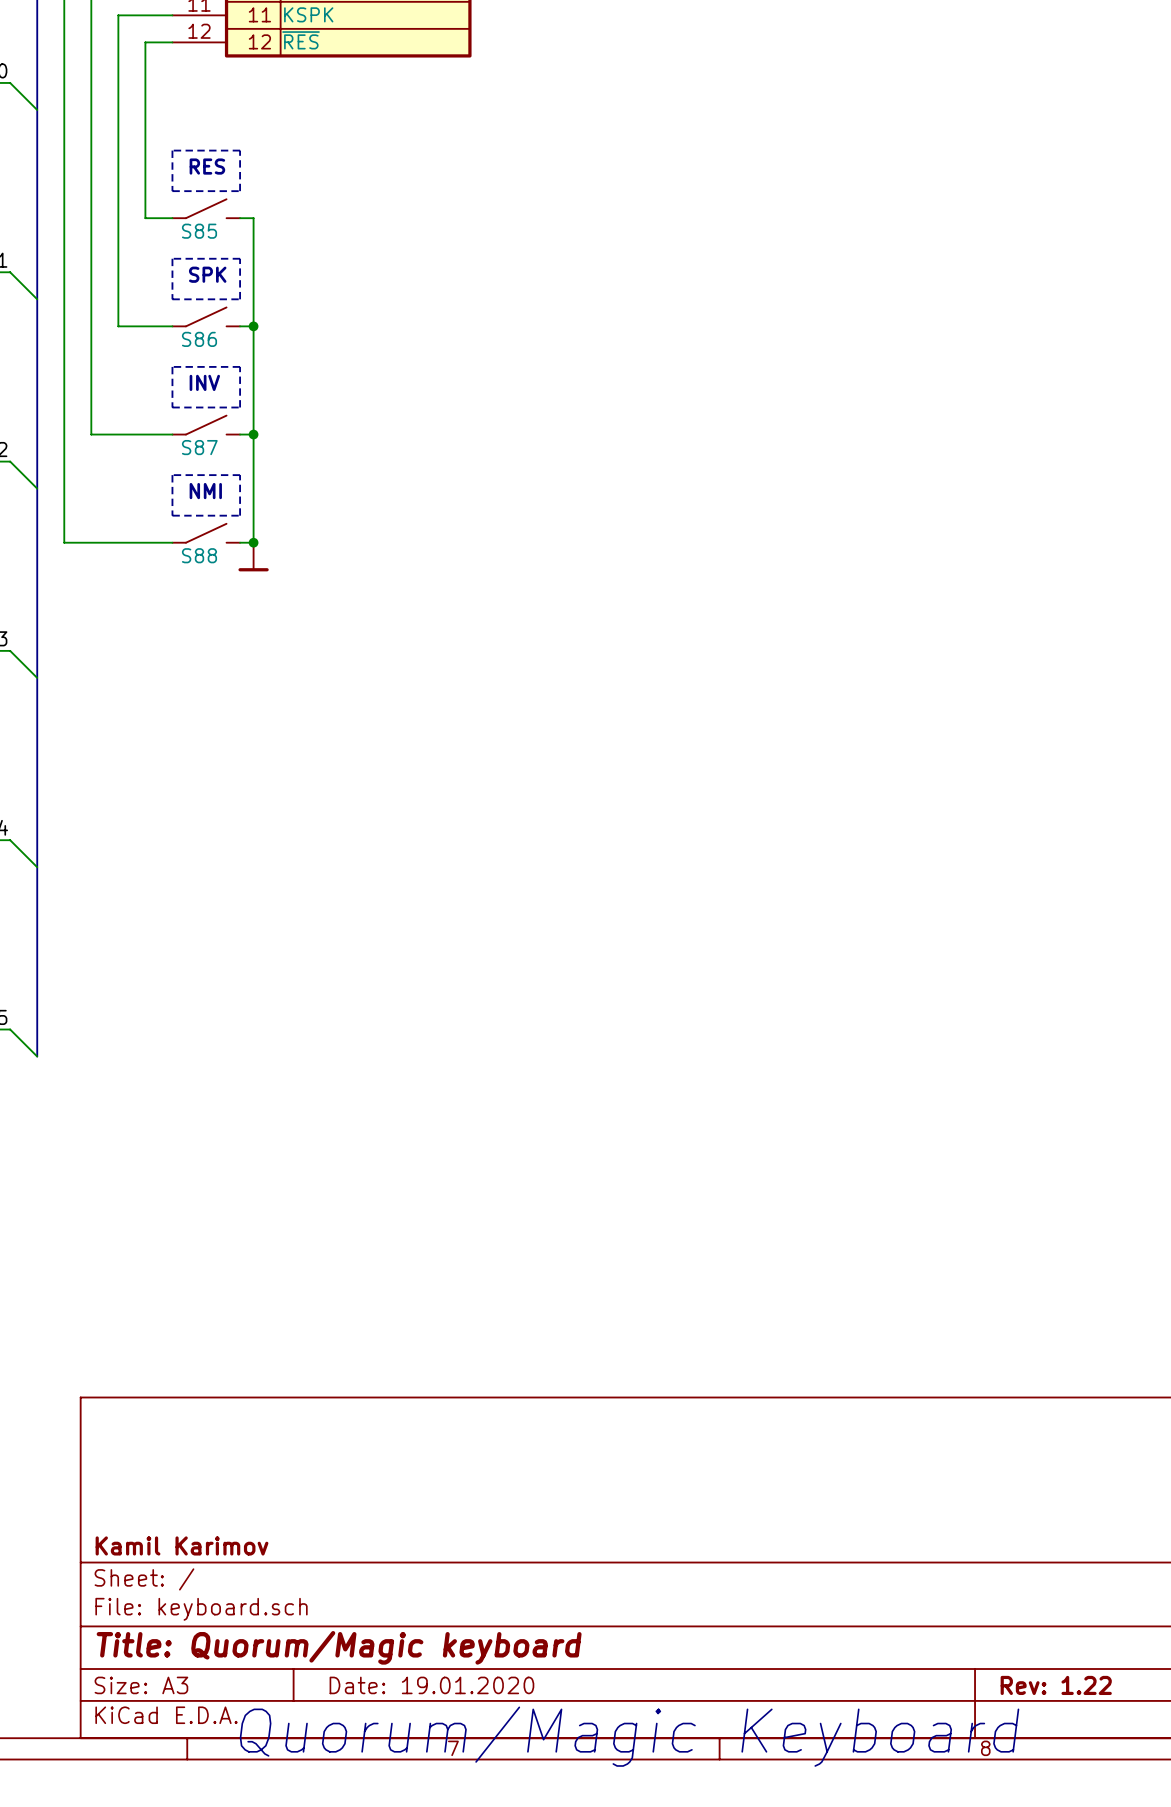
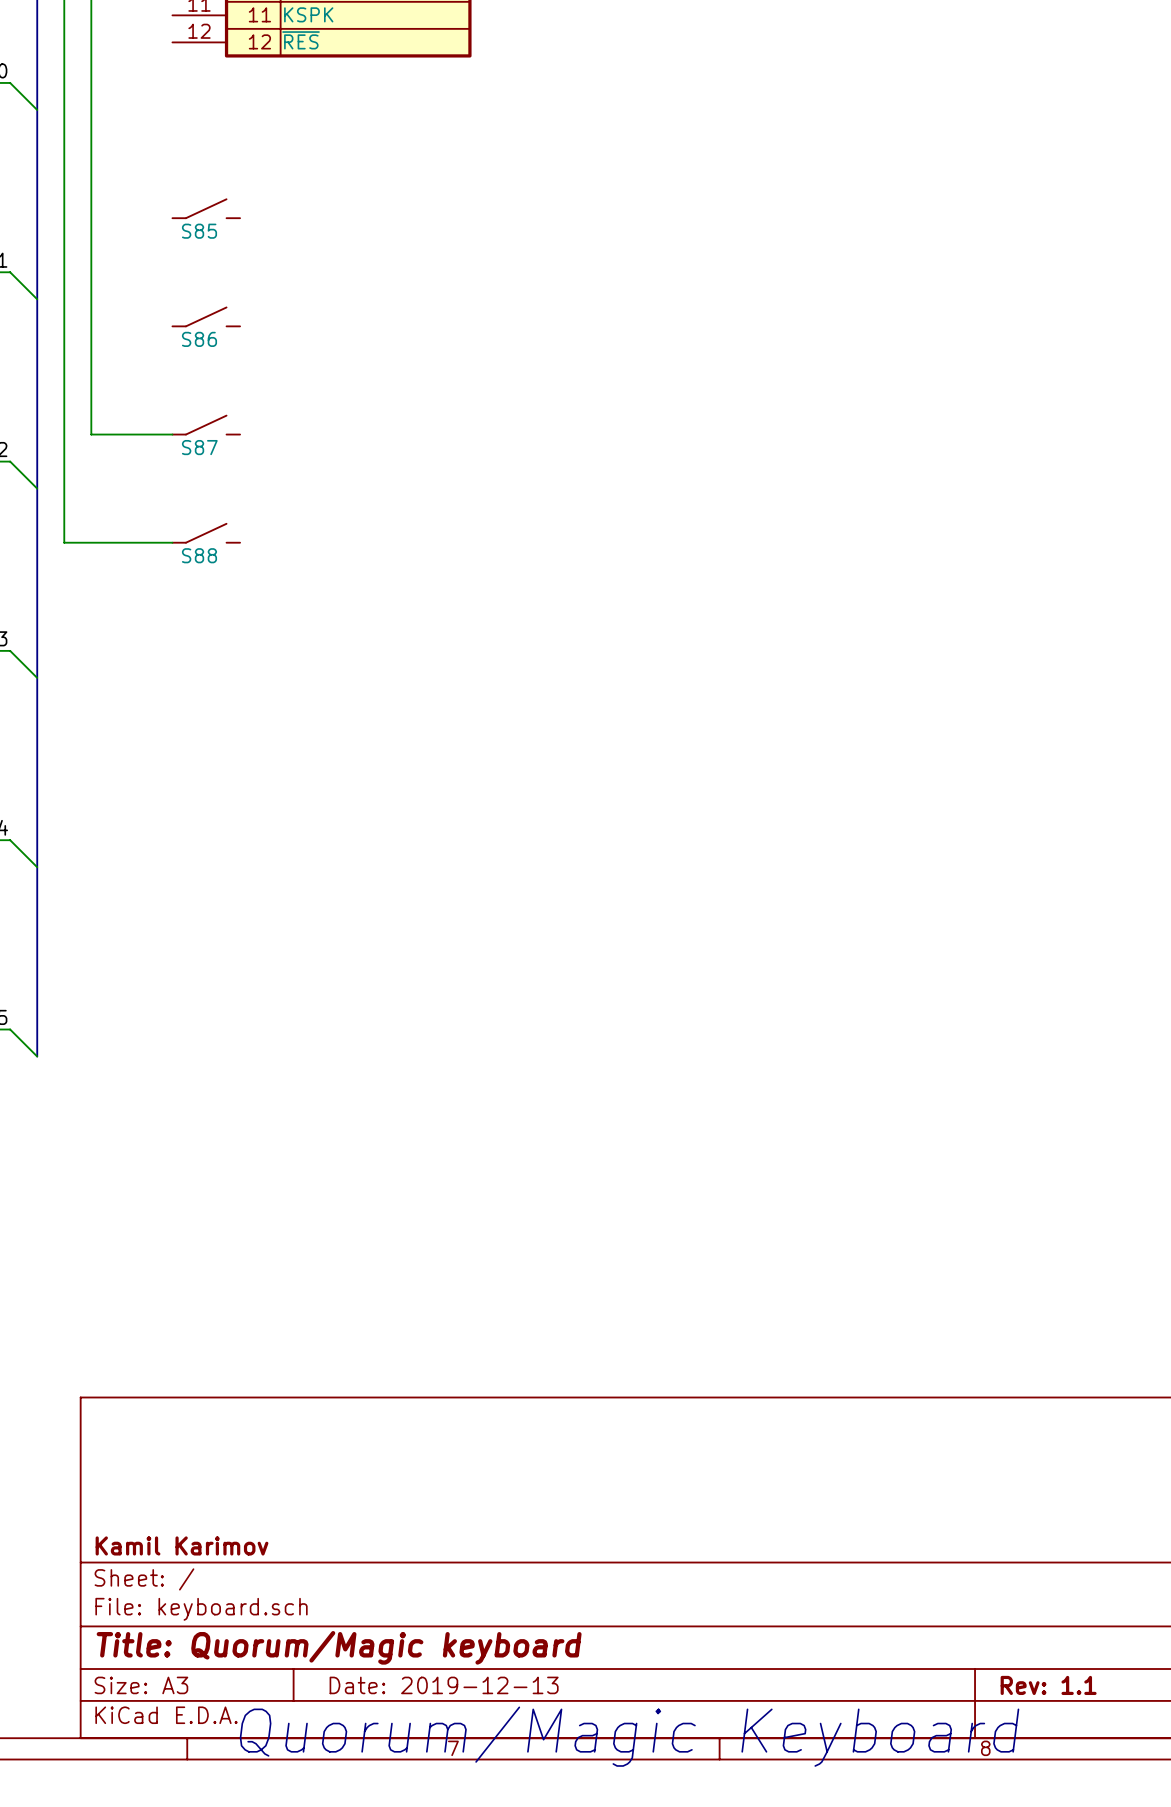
wire: (172, 15) (118, 15) (118, 326) (172, 326) -> none
wire: (172, 42) (145, 42) (145, 218) (172, 218) -> none
line: (172, 150) (172, 191) (240, 191) (240, 150) (172, 150) -> none
text: RES (207, 166) -> none
wire: (240, 218) (253, 218) (253, 542) (240, 542) -> none
line: (172, 258) (172, 299) (240, 299) (240, 258) (172, 258) -> none
text: SPK (207, 274) -> none
wire: (240, 326) (253, 326) -> none
junction: (253, 326) -> none
line: (172, 366) (240, 366) (240, 407) (172, 407) (172, 366) -> none
text: INV (204, 382) -> none
wire: (240, 434) (253, 434) -> none
junction: (253, 434) -> none
line: (172, 475) (240, 475) (240, 515) (172, 515) (172, 475) -> none
text: NMI (205, 491) -> none
junction: (253, 542) -> none
power symbol: (253, 557) -> none
title block: Date: 19.01.2020 (431, 1685) -> Date: 2019-12-13 (444, 1685)
title block: Rev: 1.22 (1056, 1685) -> Rev: 1.1 (1048, 1685)

